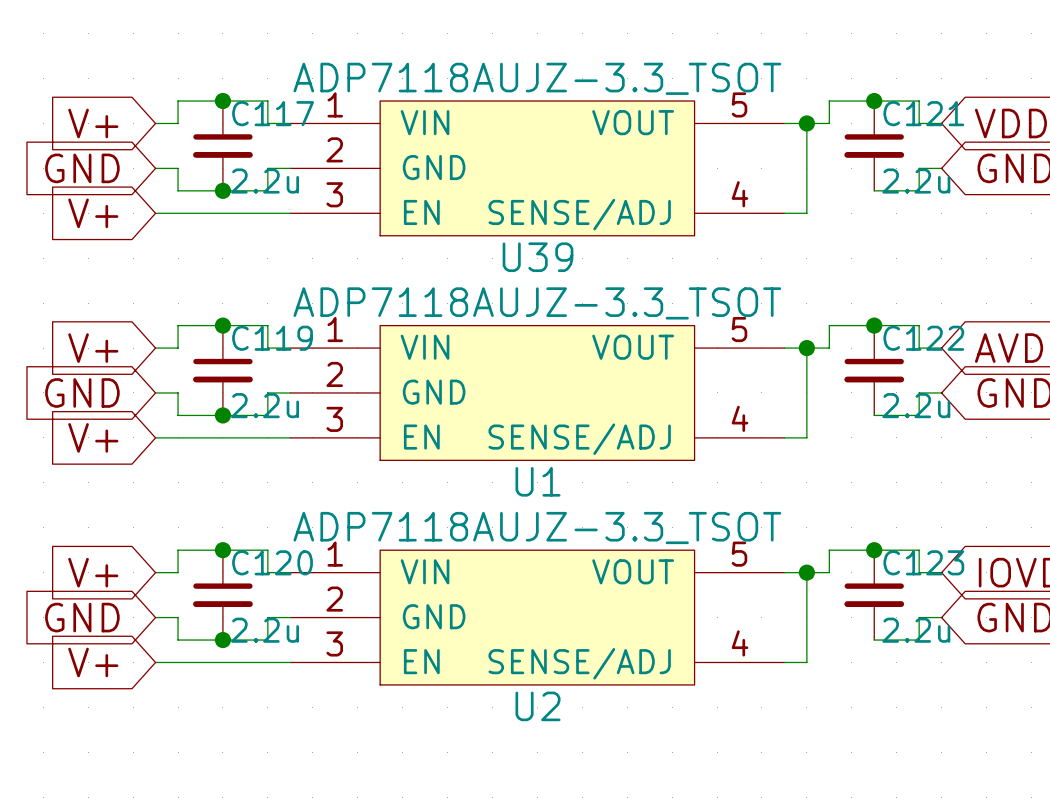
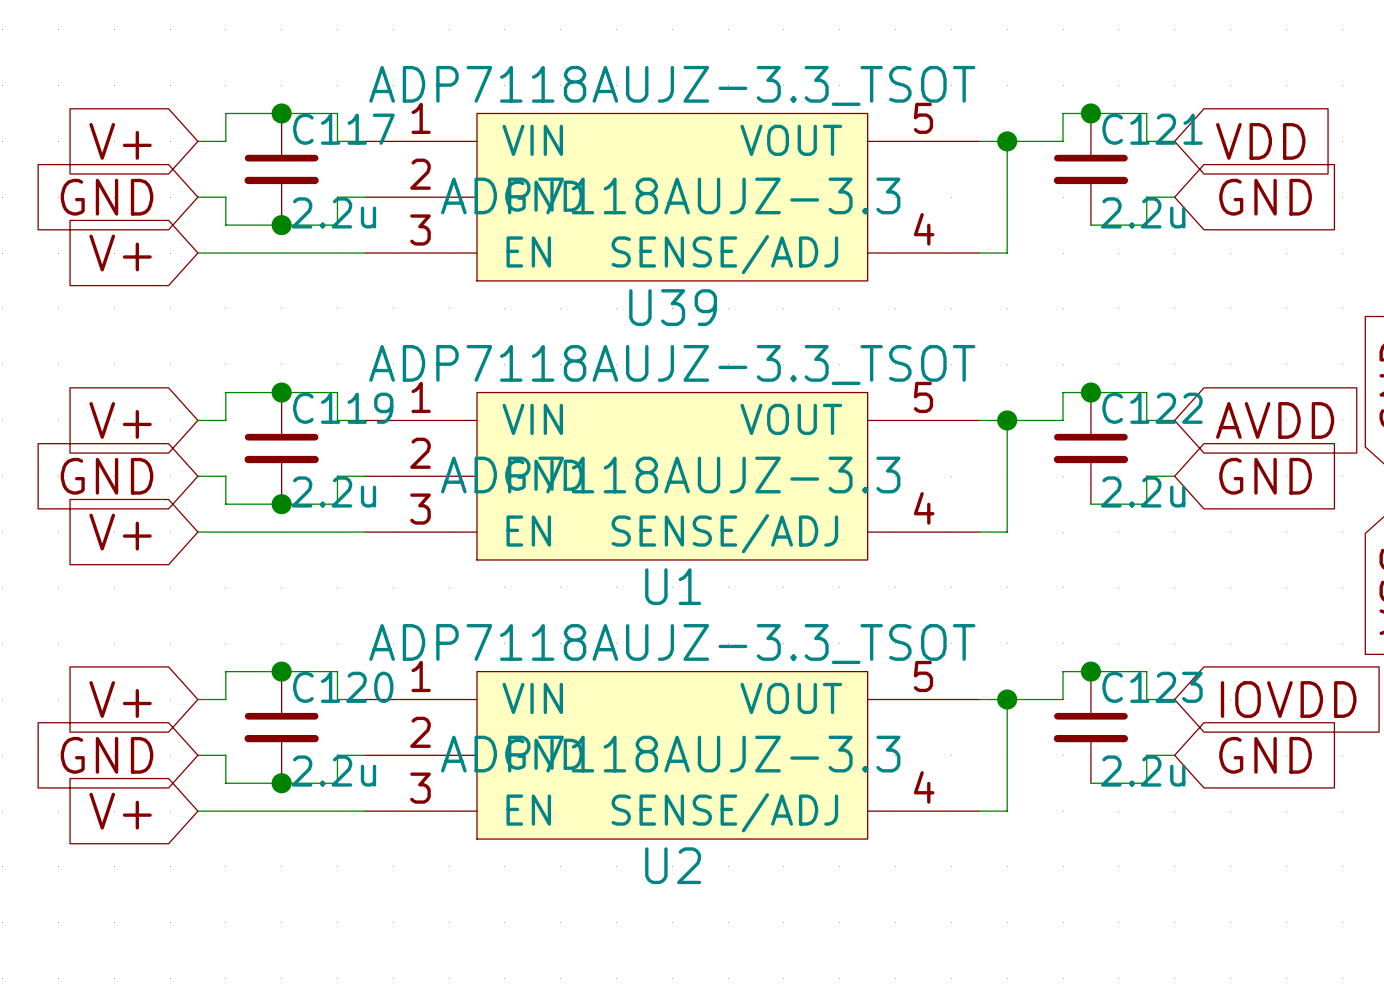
wire: (851, 101) (829, 101) (829, 123) -> (1063, 113) (1063, 141) (1035, 141)
U39 text: none -> ADP7118AUJZ-3.3 (670, 195)
wire: (851, 325) (829, 325) (829, 348) -> (1063, 392) (1063, 420) (1035, 420)
U1 text: none -> ADP7118AUJZ-3.3 (670, 475)
wire: (851, 550) (829, 550) (829, 572) -> (1063, 671) (1063, 699) (1035, 699)
U2 text: none -> ADP7118AUJZ-3.3 (670, 754)

